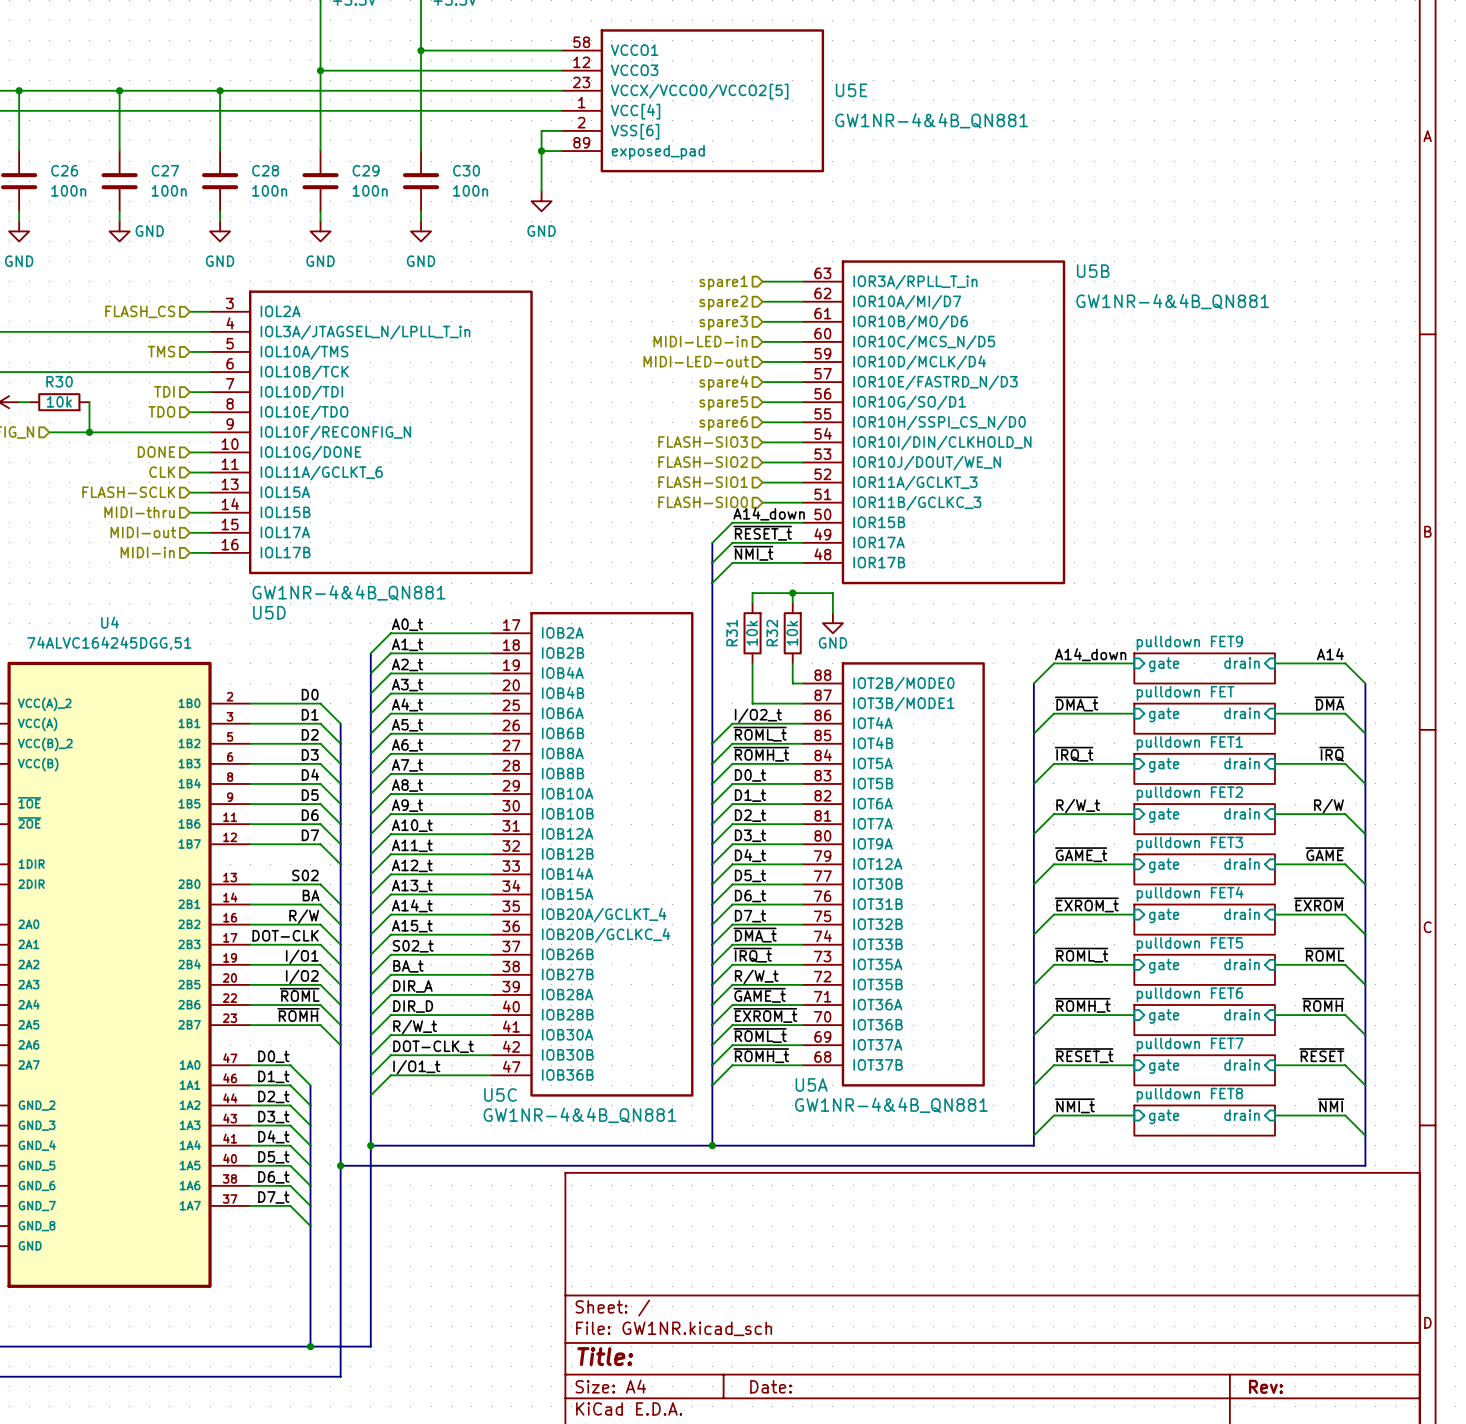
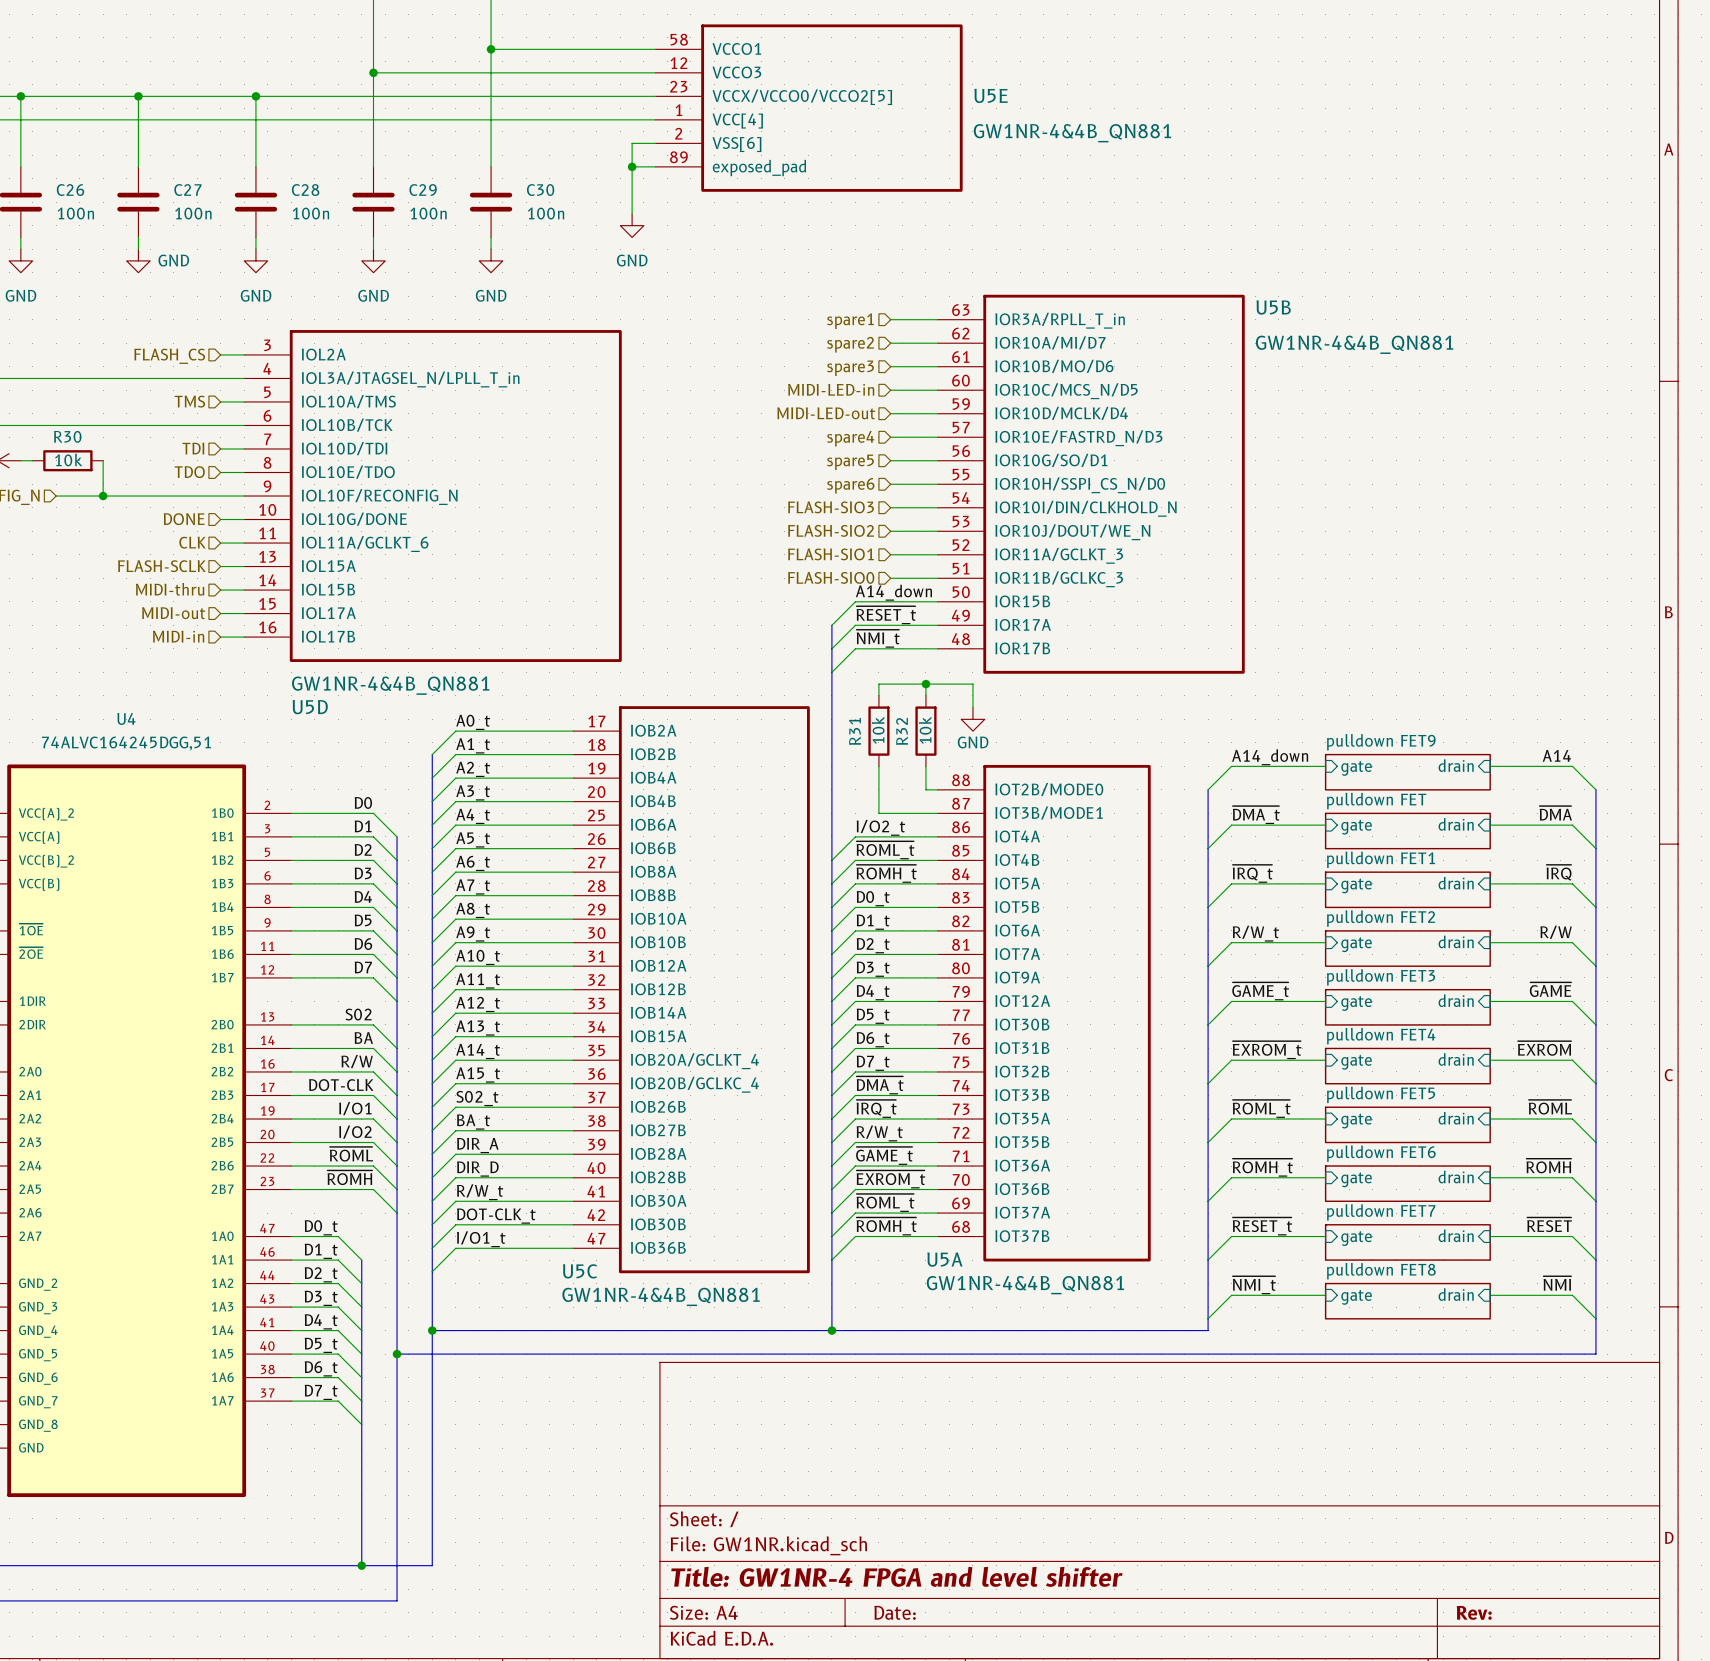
title block: Title: (605, 1356) -> Title: GW1NR-4 FPGA and level shifter (896, 1576)

